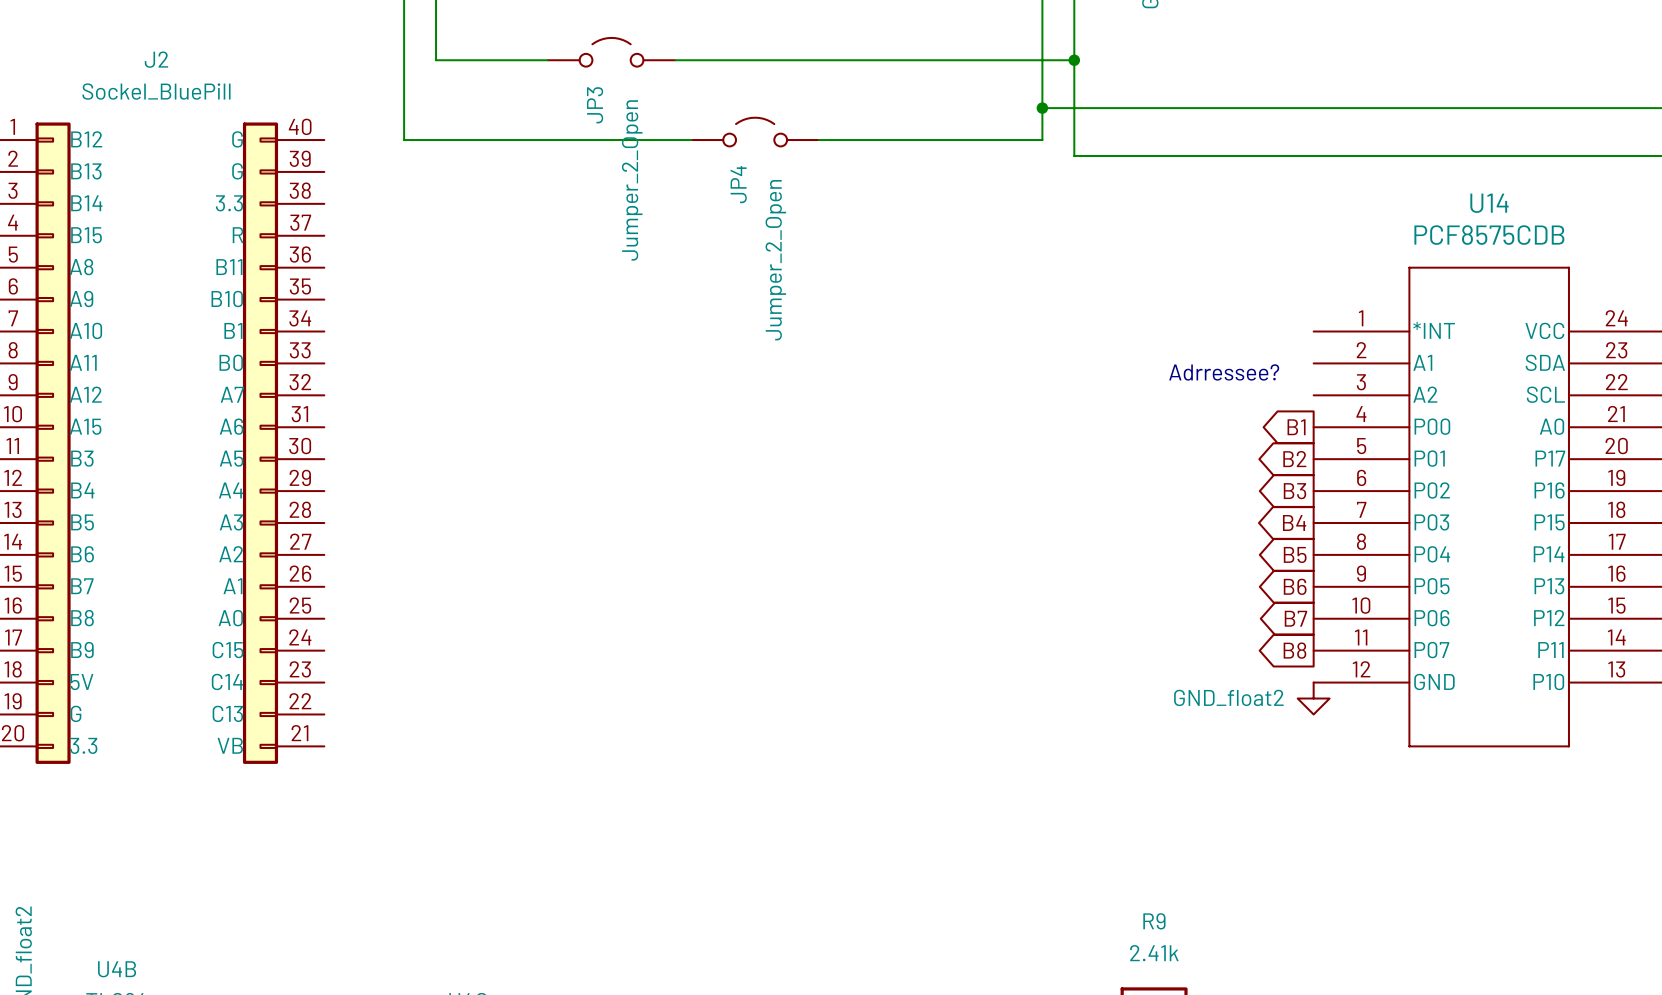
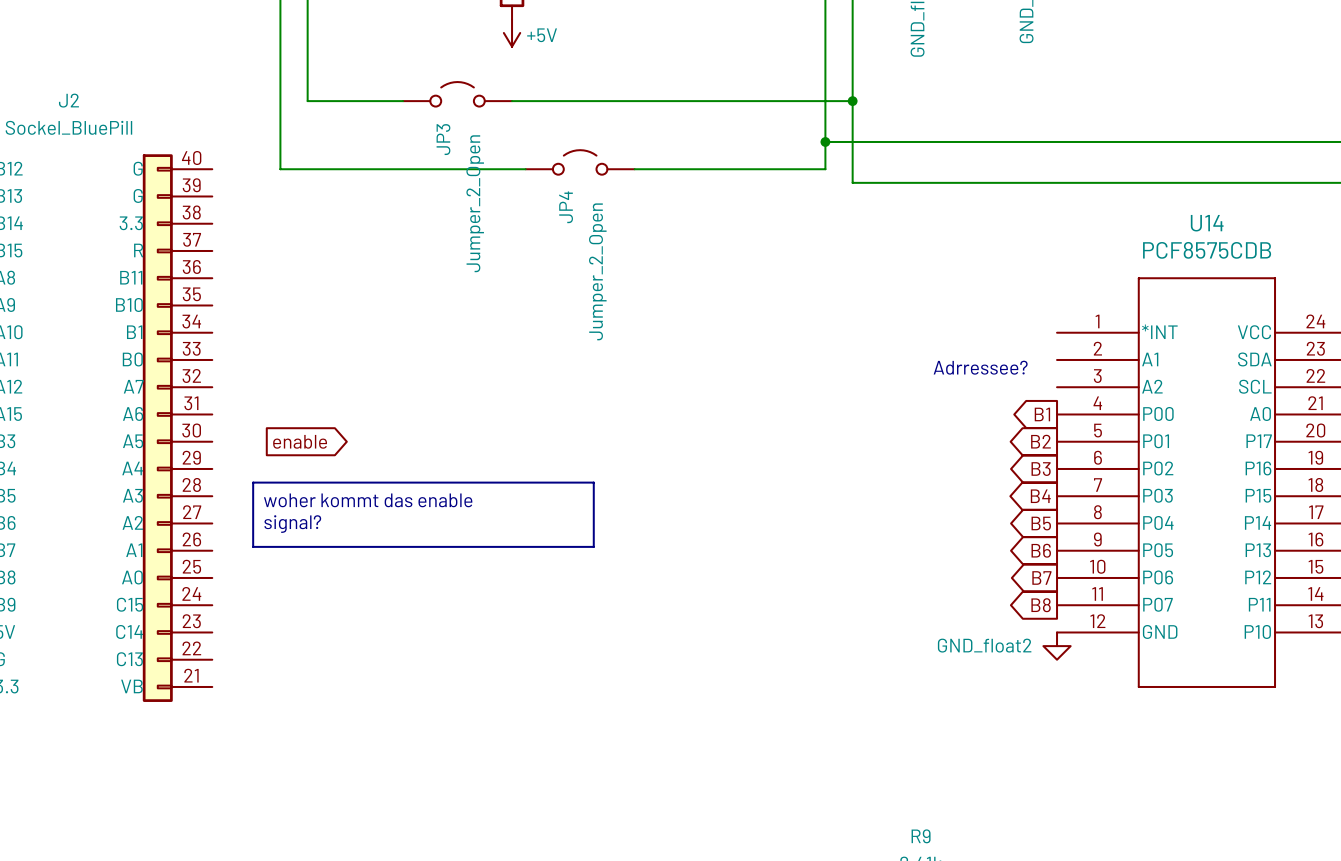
global label: none -> enable (300, 441)
line: none -> (253, 482) (593, 482) (593, 546) (253, 546) (253, 482)
text: none -> woher kommt das enable (368, 500)
text: none -> signal? (292, 524)

